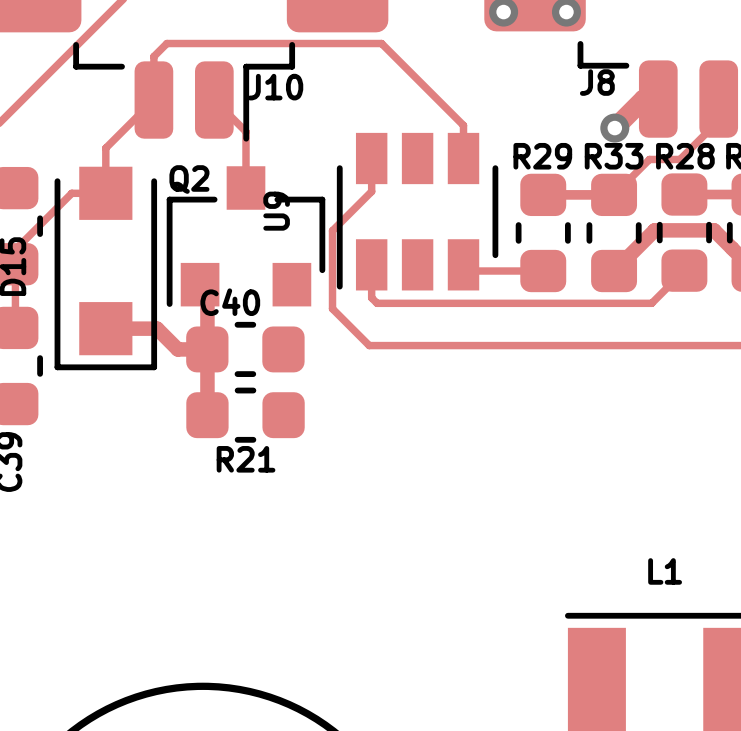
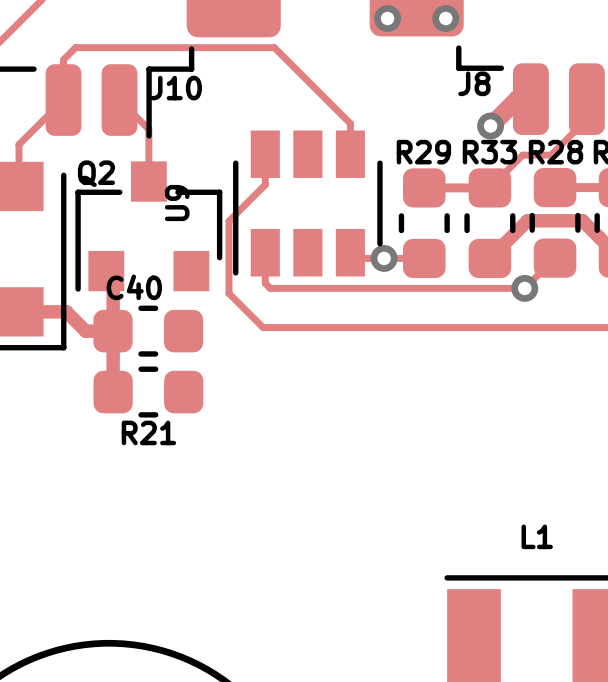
via: none -> (384, 258)
via: none -> (524, 288)

